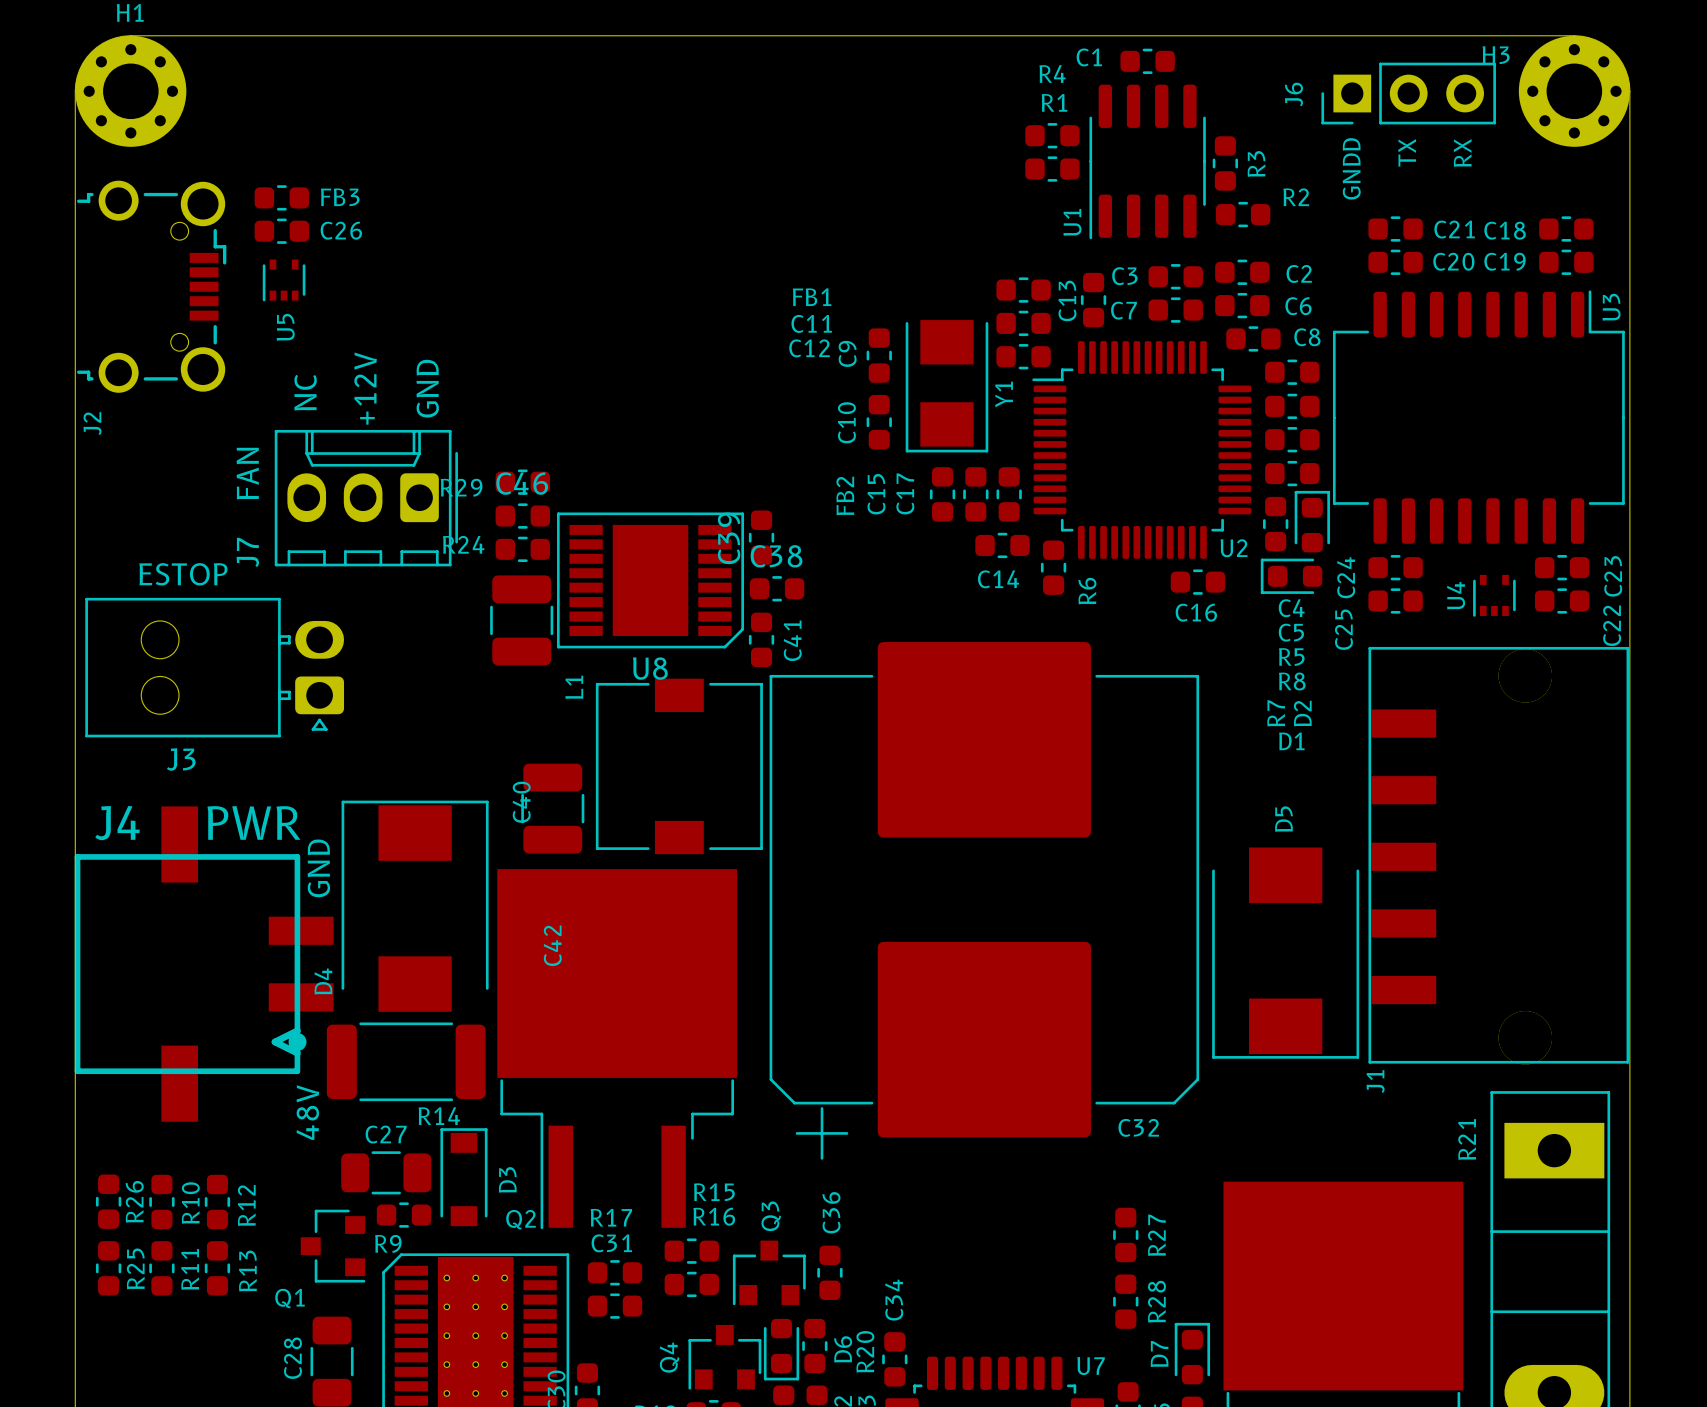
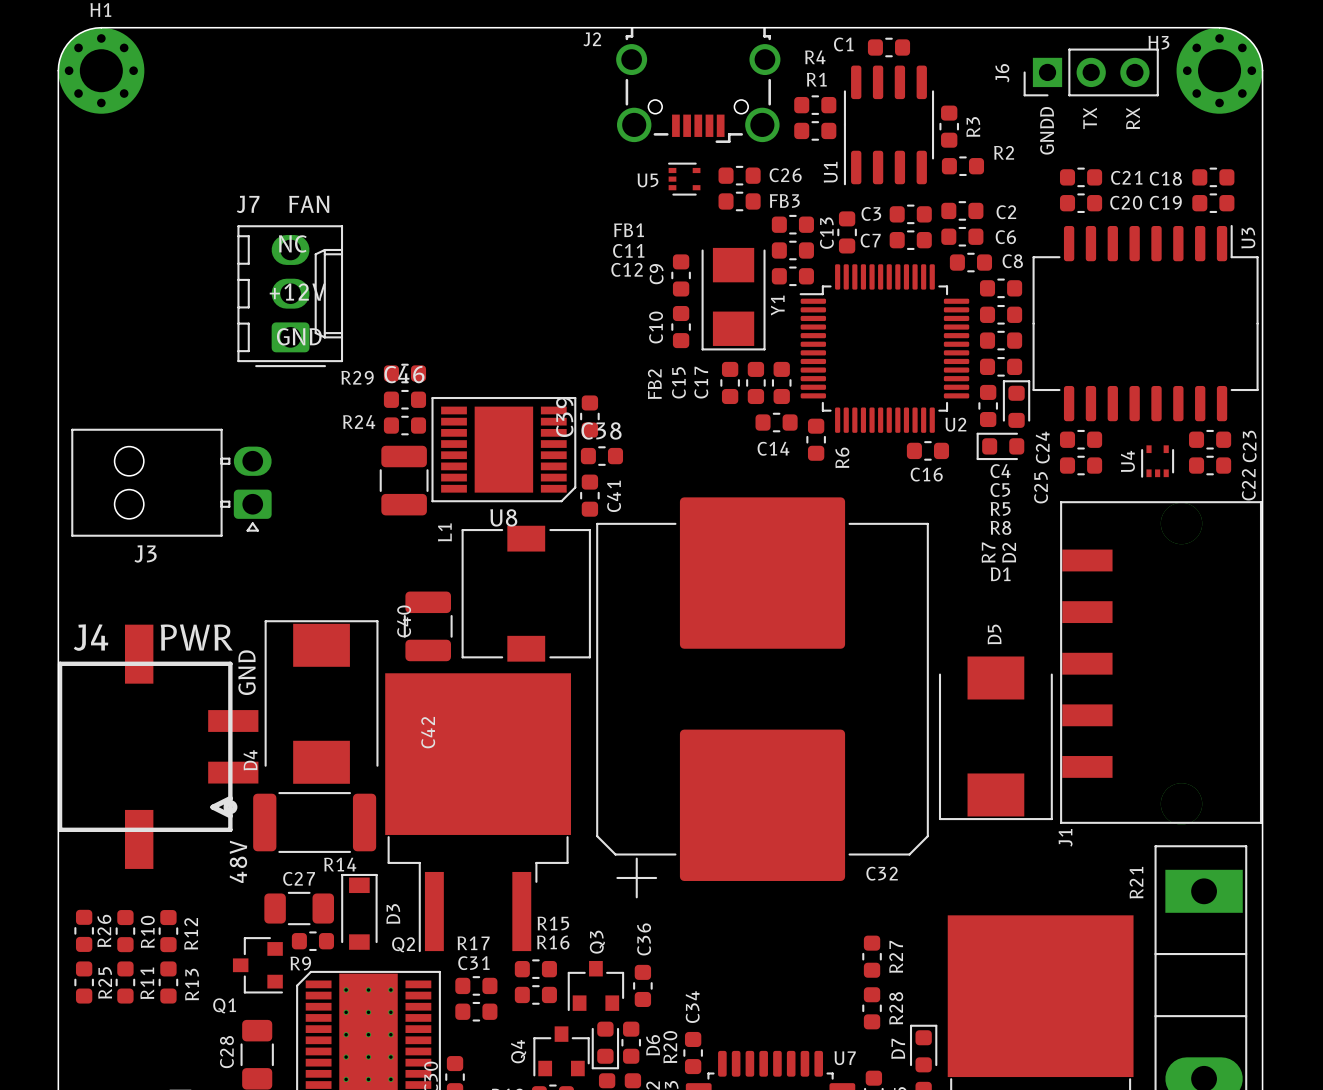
FB3 position: (281, 197) -> (739, 201)
C26 position: (281, 231) -> (739, 175)
U5 rotation: 0° (284, 280) -> 90° clockwise (684, 179)
U5 position: (284, 280) -> (684, 179)
J2 rotation: 0° (151, 286) -> 90° clockwise (698, 85)
J2 position: (151, 286) -> (698, 85)
text rotation: 0° (365, 388) -> 90° clockwise (297, 292)
text rotation: 0° (427, 388) -> 90° clockwise (299, 336)
text rotation: 0° (305, 392) -> 90° clockwise (292, 243)
text position: NC (305, 392) -> NC (292, 243)
J7 rotation: 0° (366, 498) -> 90° clockwise (290, 296)
J7 position: (366, 498) -> (290, 296)
J3 value: ESTOP (183, 574) -> none
J3 position: (214, 667) -> (171, 482)

